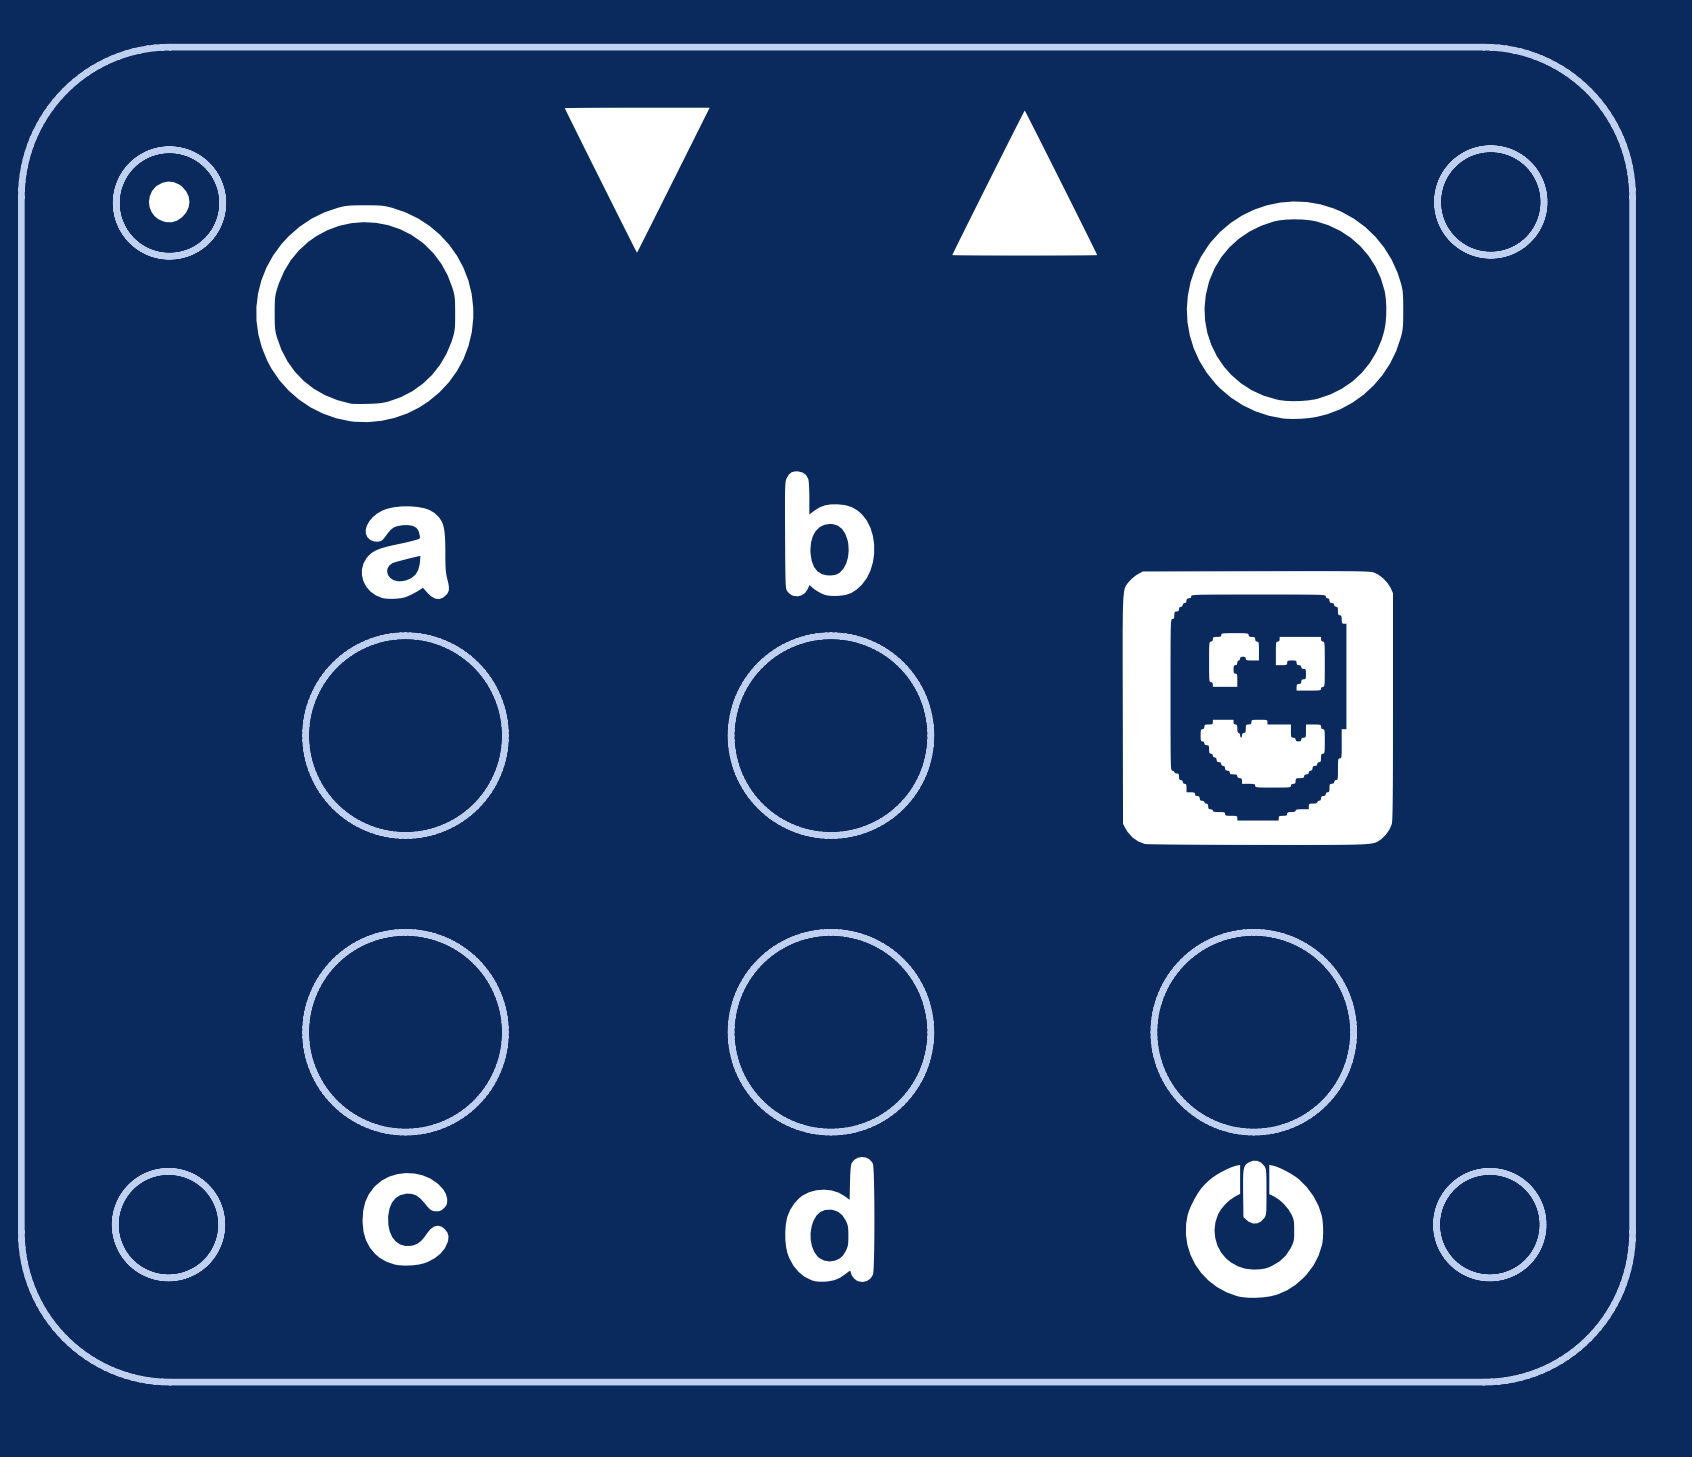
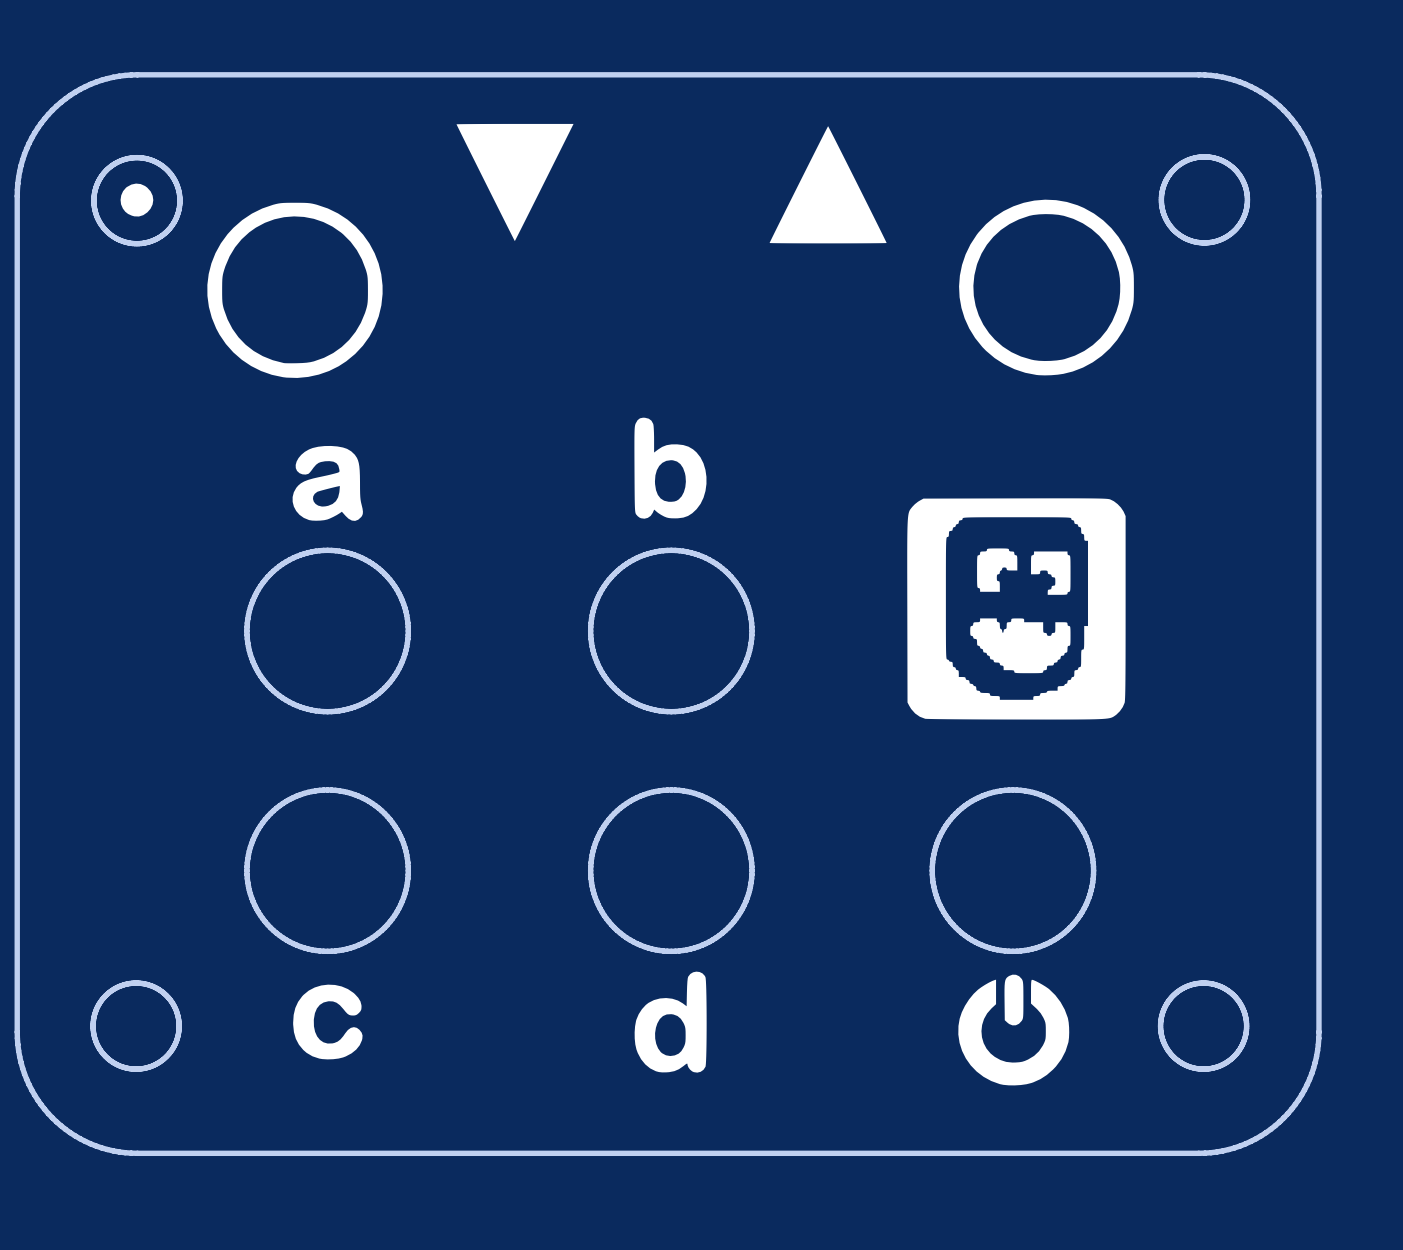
drawing shape: [148, 107, 1404, 1298] -> [120, 123, 1134, 1086]

